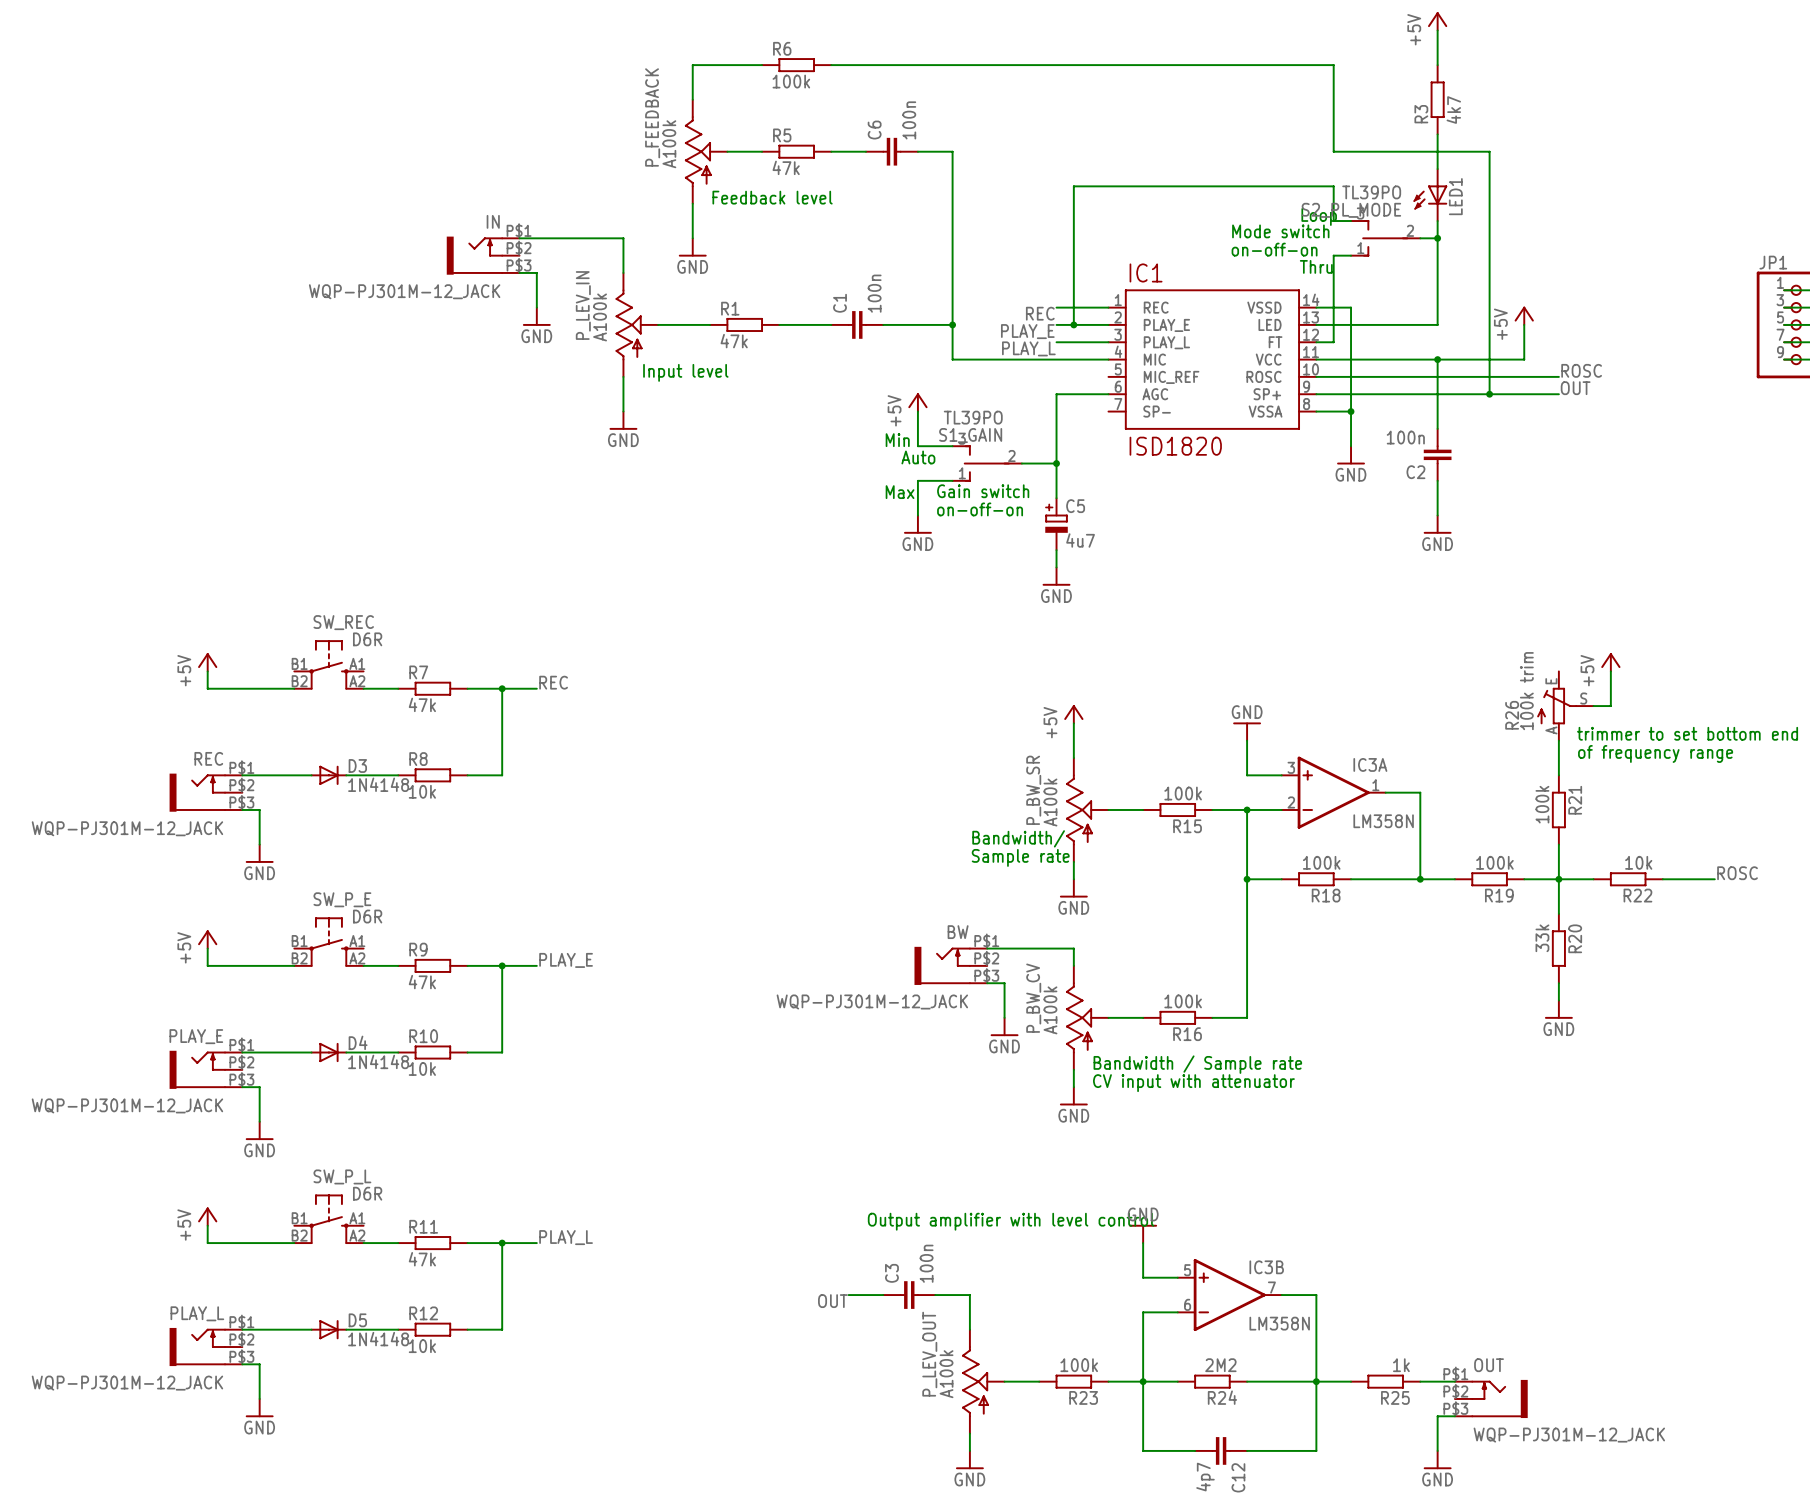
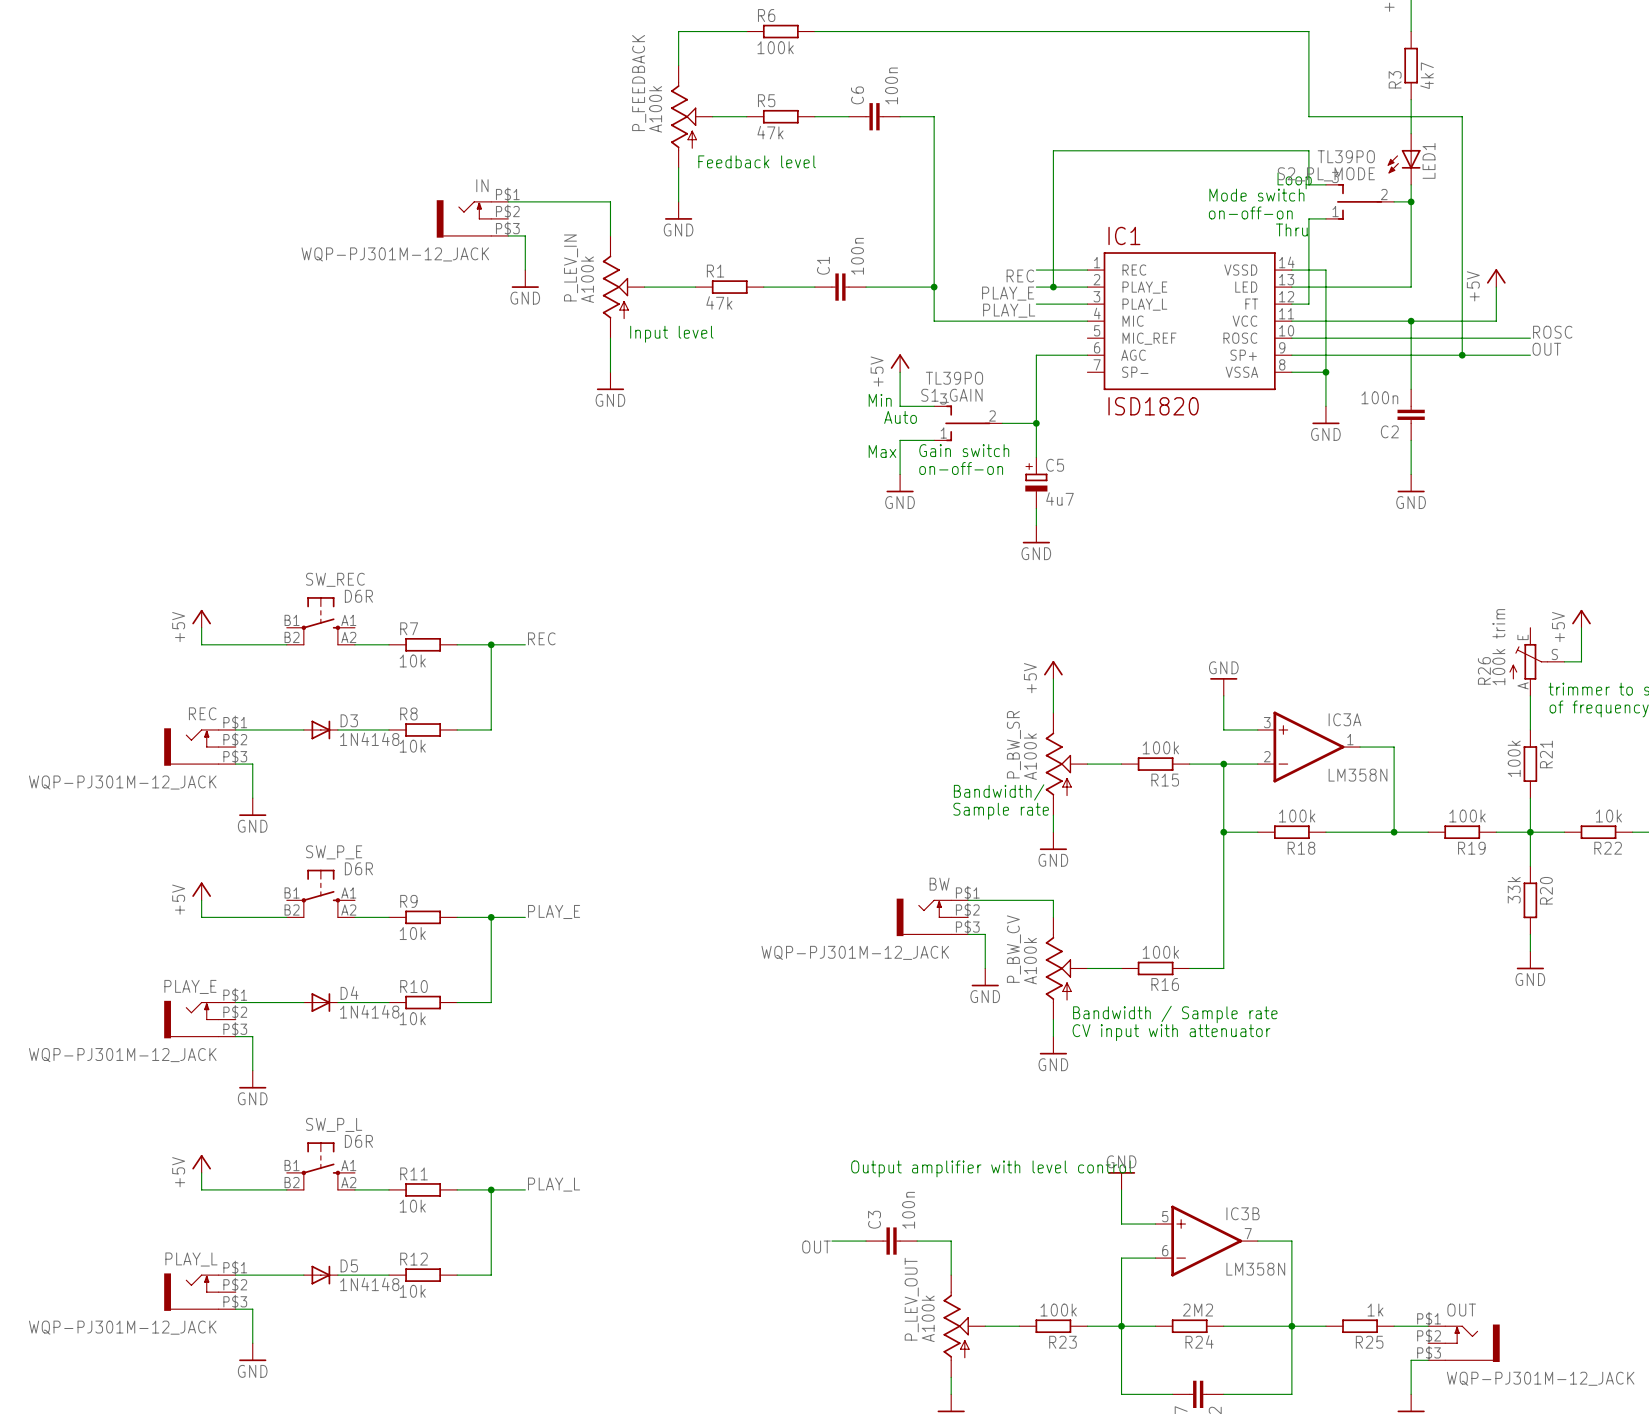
R7 value: 47k (422, 704) -> 10k (412, 661)
R9 value: 47k (422, 982) -> 10k (412, 933)
R11 value: 47k (422, 1259) -> 10k (412, 1206)

